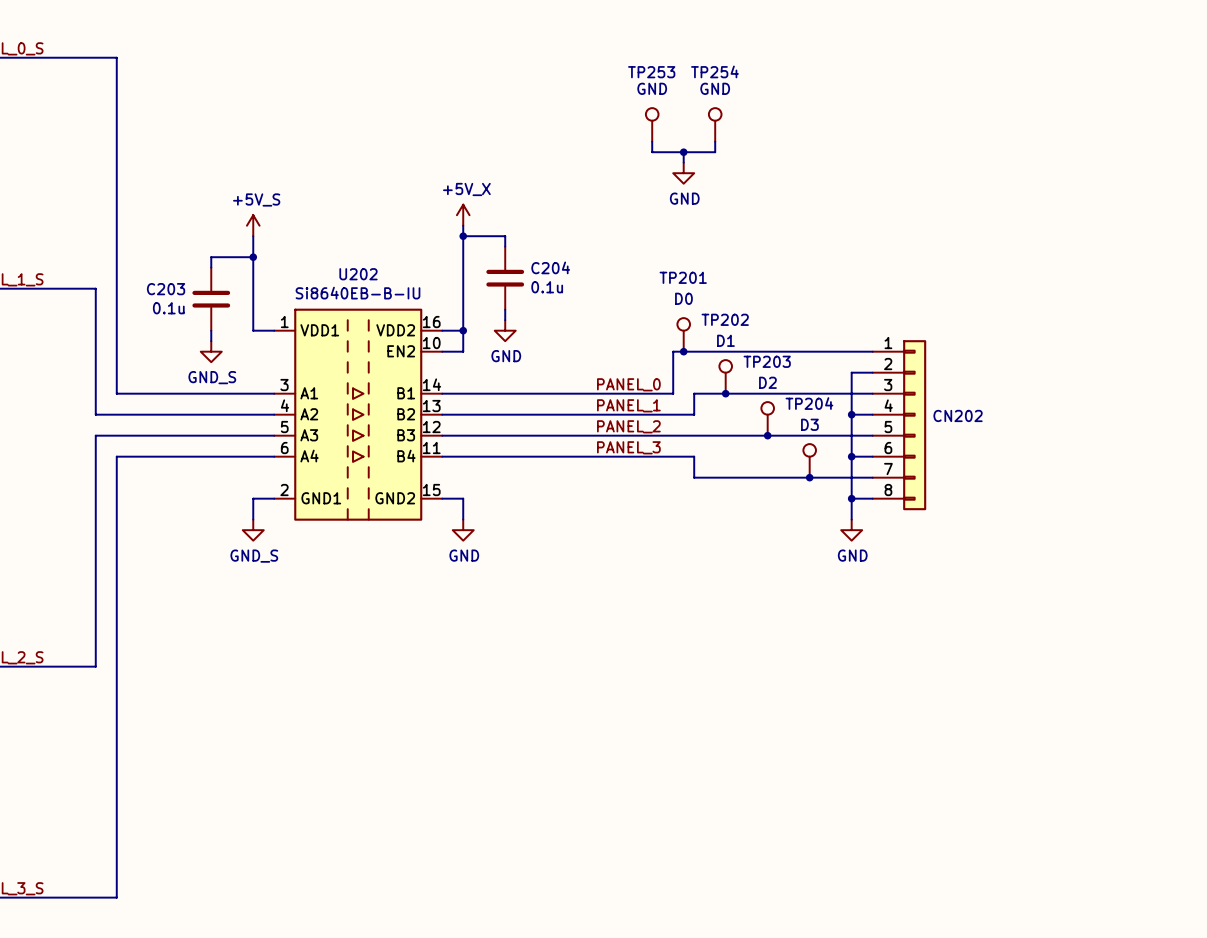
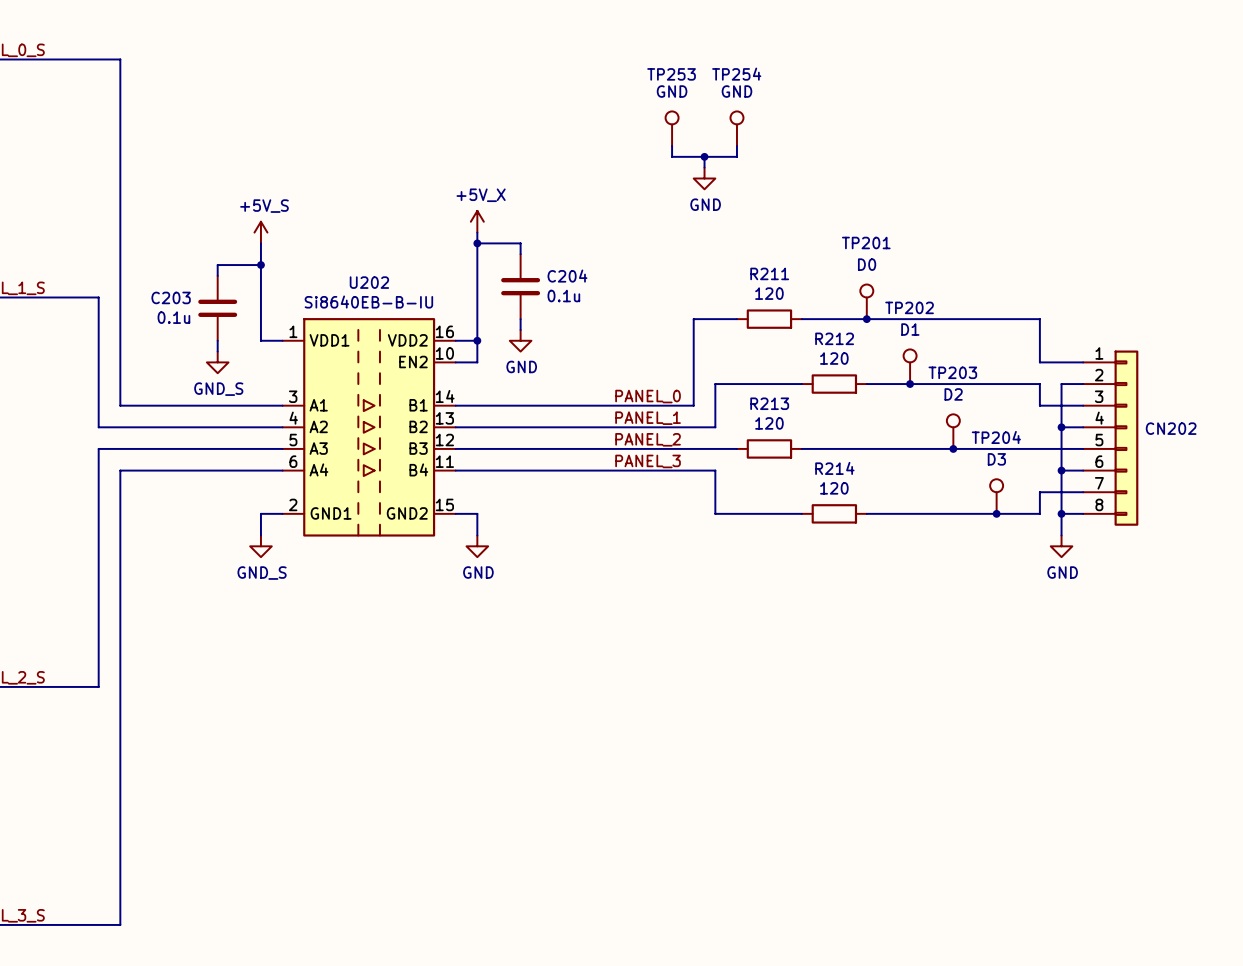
R211: none -> 120 (769, 319)
wire: none -> (801, 319) (1039, 319) (1039, 362) (1083, 362)
junction: none -> (866, 319)
TP201 position: (683, 334) -> (866, 301)
wire: (673, 351) (872, 351) -> (693, 362) (693, 319) (736, 319)
junction: (683, 351) -> none
R212: none -> 120 (834, 384)
wire: (851, 372) (851, 519) -> (877, 384) (866, 384)
wire: none -> (899, 384) (1039, 384) (1039, 405) (1083, 405)
junction: none -> (910, 384)
wire: none -> (1083, 384) (1061, 384) (1061, 535)
TP202 position: (725, 376) -> (910, 366)
wire: (694, 393) (872, 393) -> (715, 405) (715, 384) (801, 384)
junction: (725, 393) -> none
wire: (851, 414) (872, 414) -> (1061, 470) (1083, 470)
junction: (851, 414) -> none
wire: none -> (1061, 427) (1083, 427)
junction: none -> (1061, 427)
TP203 position: (767, 418) -> (953, 431)
CN202 position: (899, 425) -> (1110, 438)
wire: (715, 435) (778, 435) -> none
R213: none -> 120 (769, 448)
junction: (767, 435) -> none
wire: none -> (899, 448) (1083, 448)
junction: none -> (953, 448)
wire: (851, 456) (872, 456) -> (1061, 513) (1083, 513)
junction: (851, 456) -> none
junction: none -> (1061, 470)
TP204 position: (809, 460) -> (996, 496)
wire: (694, 477) (872, 477) -> (715, 492) (715, 513) (801, 513)
junction: (809, 477) -> none
wire: none -> (1083, 492) (1039, 492) (1039, 513) (899, 513)
R214: none -> 120 (834, 513)
wire: none -> (866, 513) (877, 513)
junction: (851, 498) -> none
junction: none -> (996, 513)
junction: none -> (1061, 513)
power symbol position: GND (851, 530) -> GND (1061, 546)

